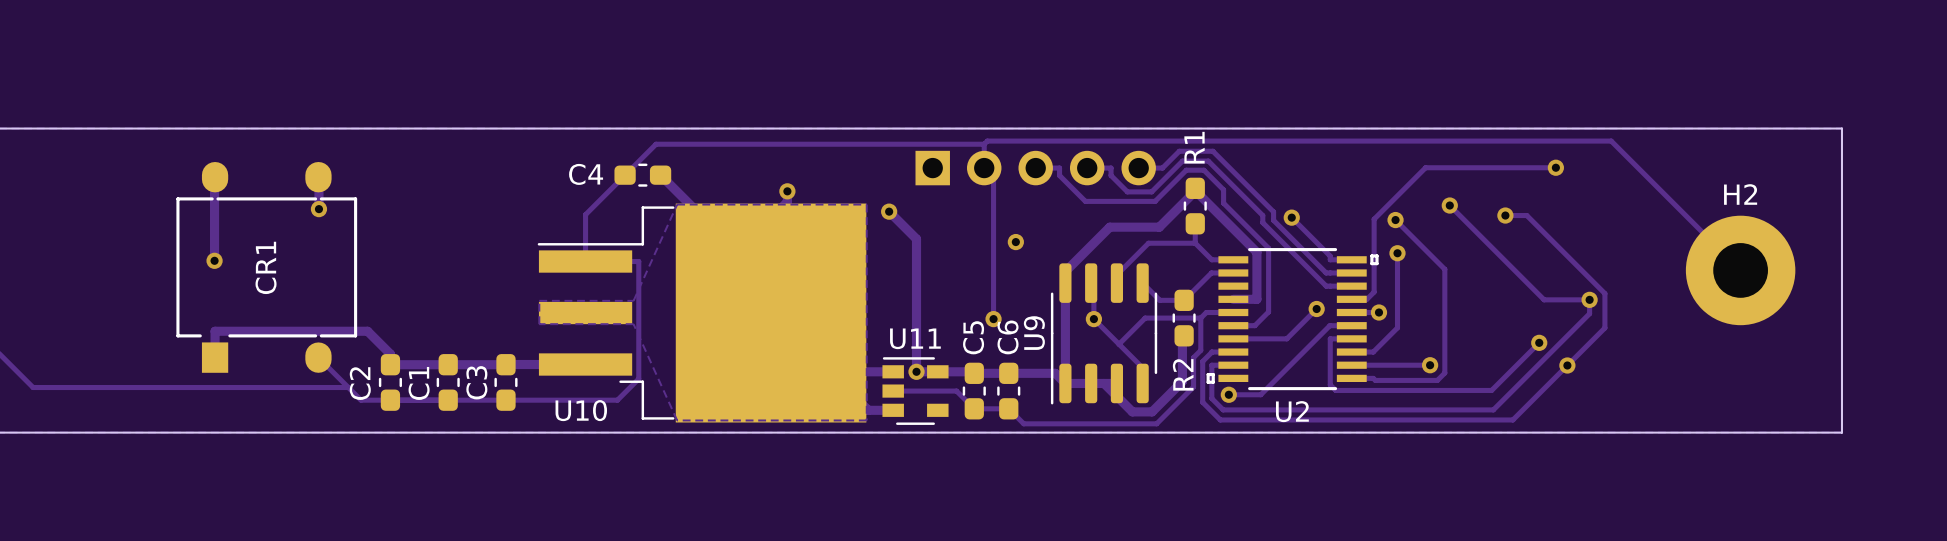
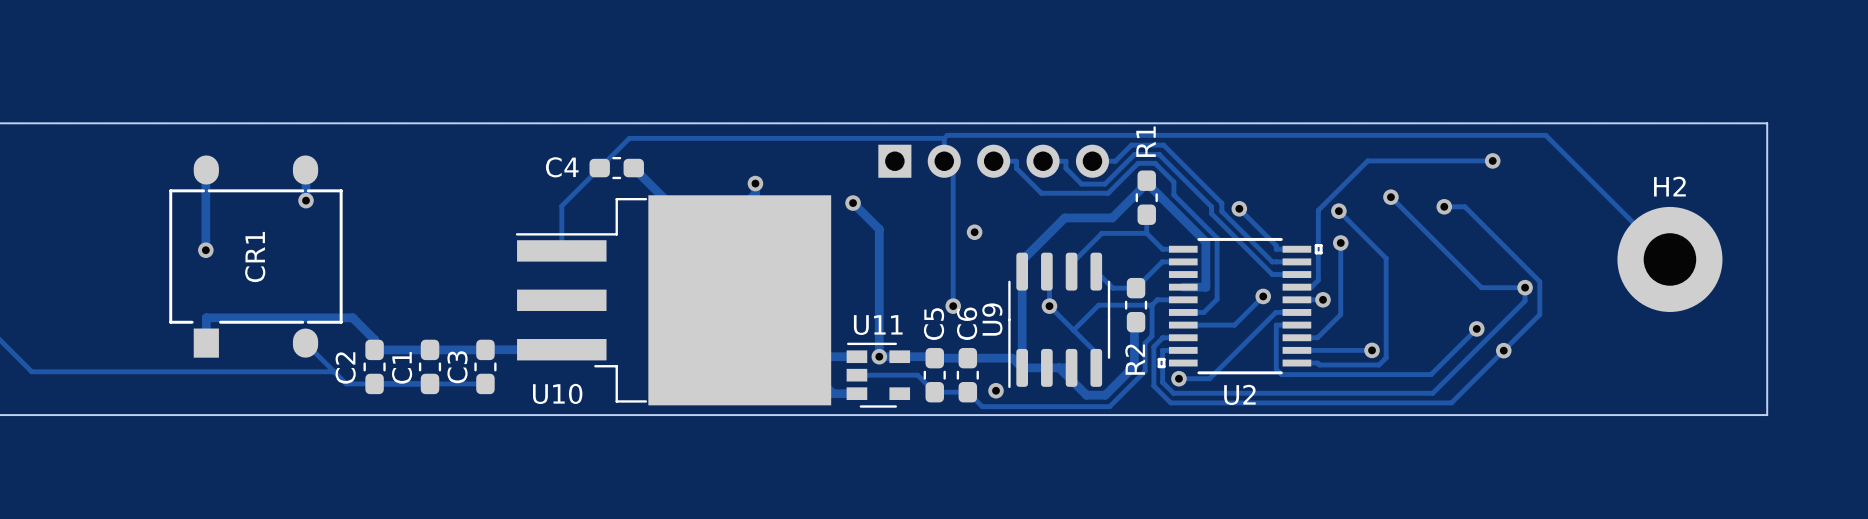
zone outline: (677, 204) (633, 300) (539, 300) (539, 324) (633, 324) (677, 420) (866, 420) (866, 204) (677, 204) -> none
track: (585, 261) (638, 261) (638, 378) (617, 400) (505, 400) -> none
via: none -> (996, 390)

